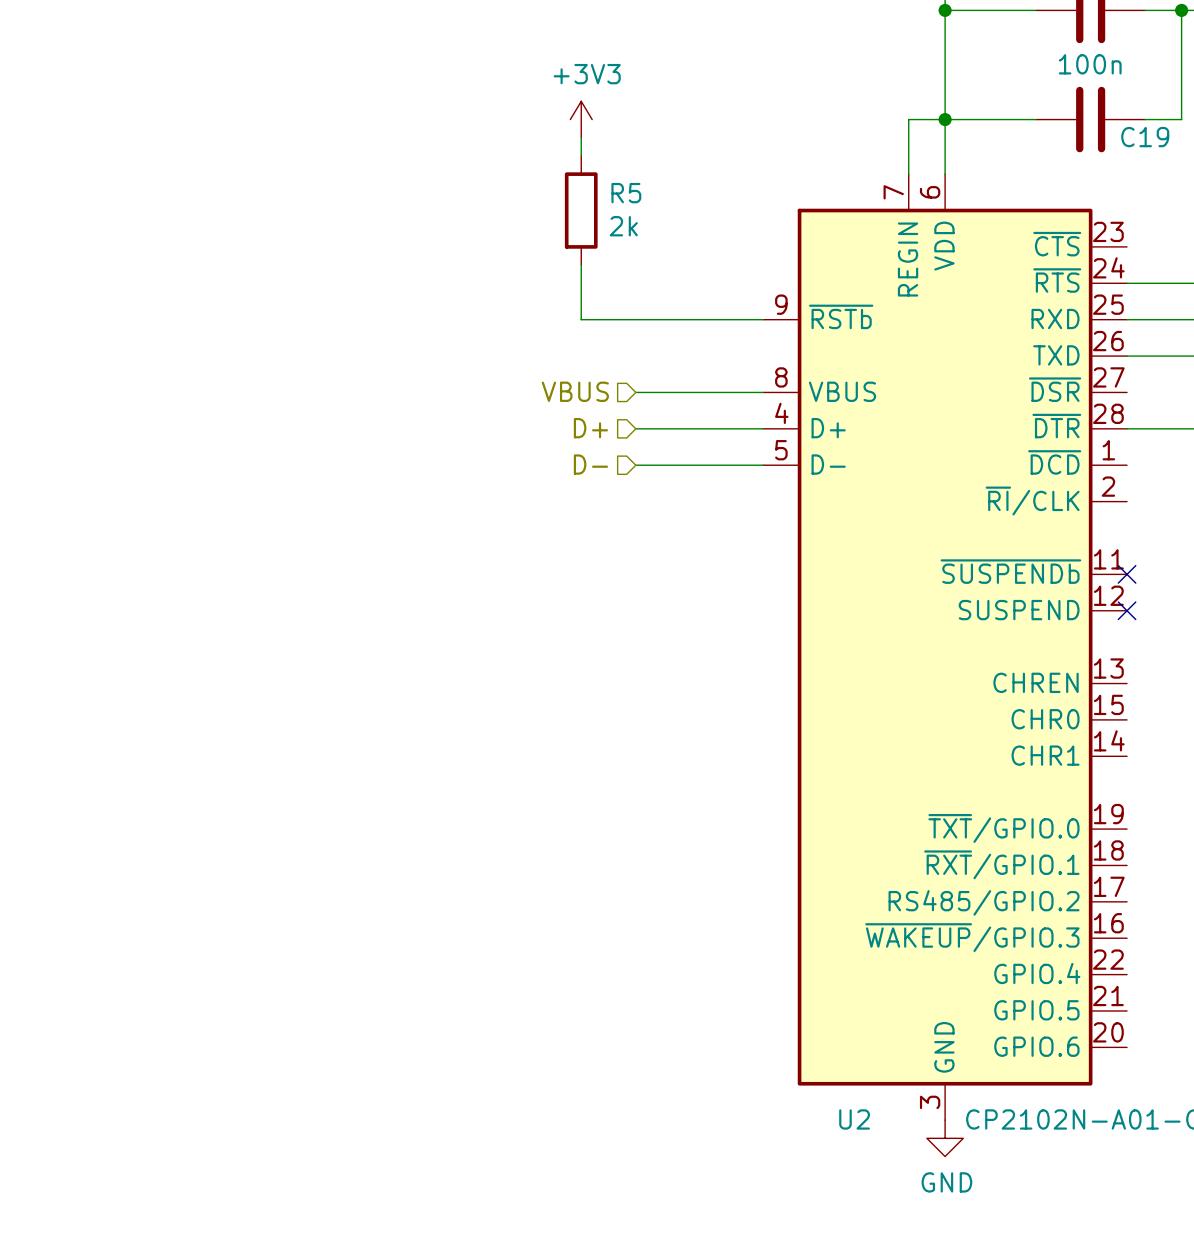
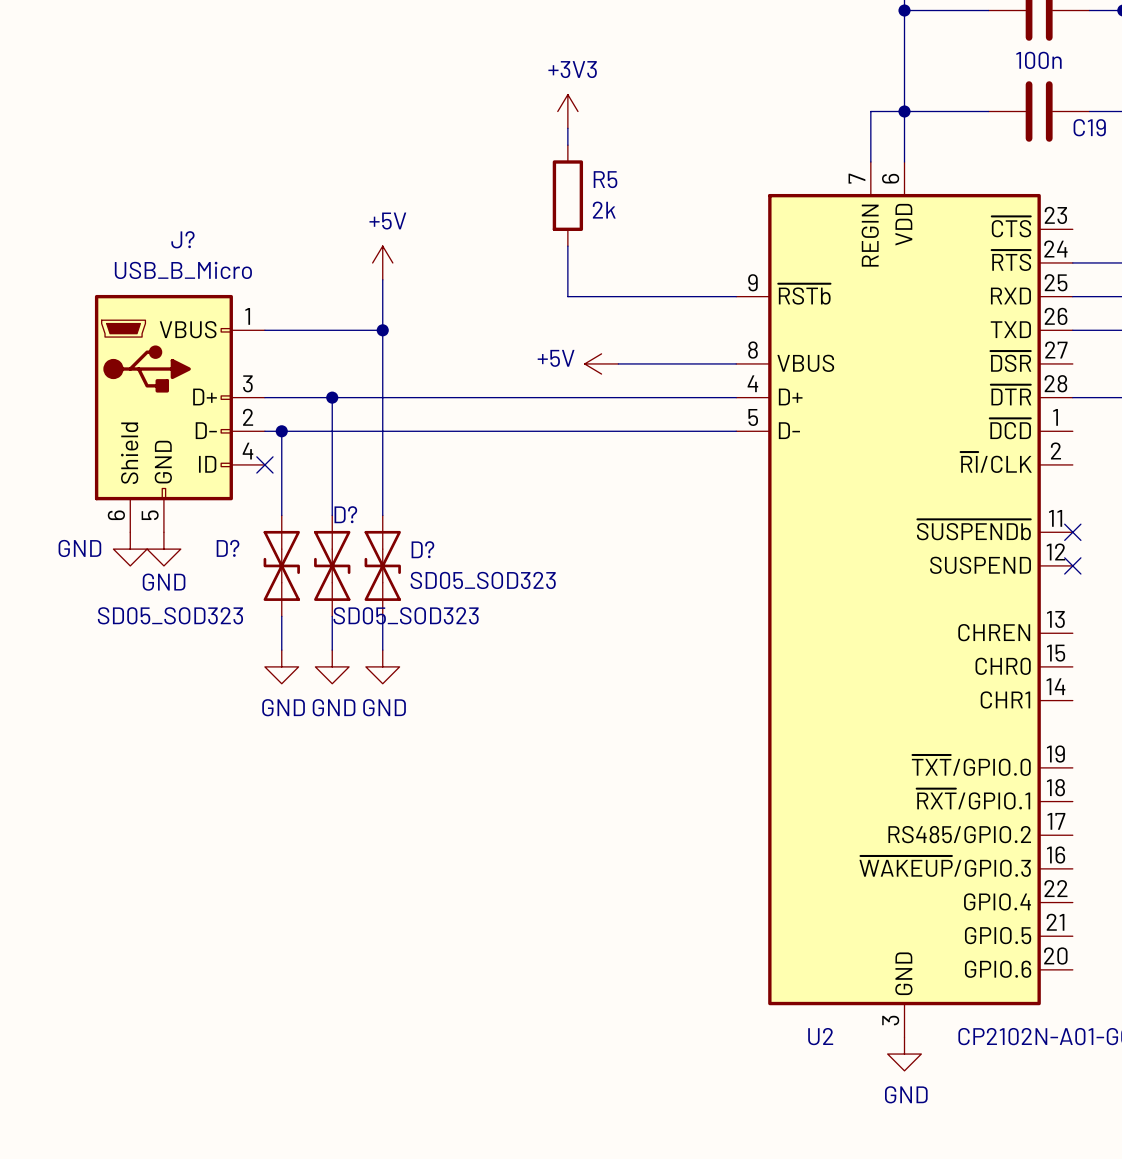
power symbol: none -> +5V (382, 262)
wire: none -> (382, 279) (382, 515)
wire: none -> (264, 330) (382, 330)
junction: none -> (382, 330)
hierarchical label: VBUS (575, 391) -> none
power symbol: none -> +5V (601, 363)
wire: none -> (264, 397) (618, 397)
wire: none -> (332, 397) (332, 515)
junction: none -> (332, 397)
hierarchical label: D+ (590, 428) -> none
J?: none -> USB_B_Micro (179, 413)
hierarchical label: D- (590, 464) -> none
wire: none -> (264, 431) (618, 431)
wire: none -> (281, 431) (281, 515)
junction: none -> (281, 431)
no-connect mark: none -> (264, 464)
power symbol: none -> GND (130, 549)
power symbol: none -> GND (163, 549)
D?: none -> SD05_SOD323 (281, 565)
D?: none -> SD05_SOD323 (332, 565)
D?: none -> SD05_SOD323 (382, 565)
wire: none -> (281, 616) (281, 650)
wire: none -> (332, 616) (332, 650)
wire: none -> (382, 616) (382, 650)
power symbol: none -> GND (281, 666)
power symbol: none -> GND (332, 666)
power symbol: none -> GND (382, 666)

